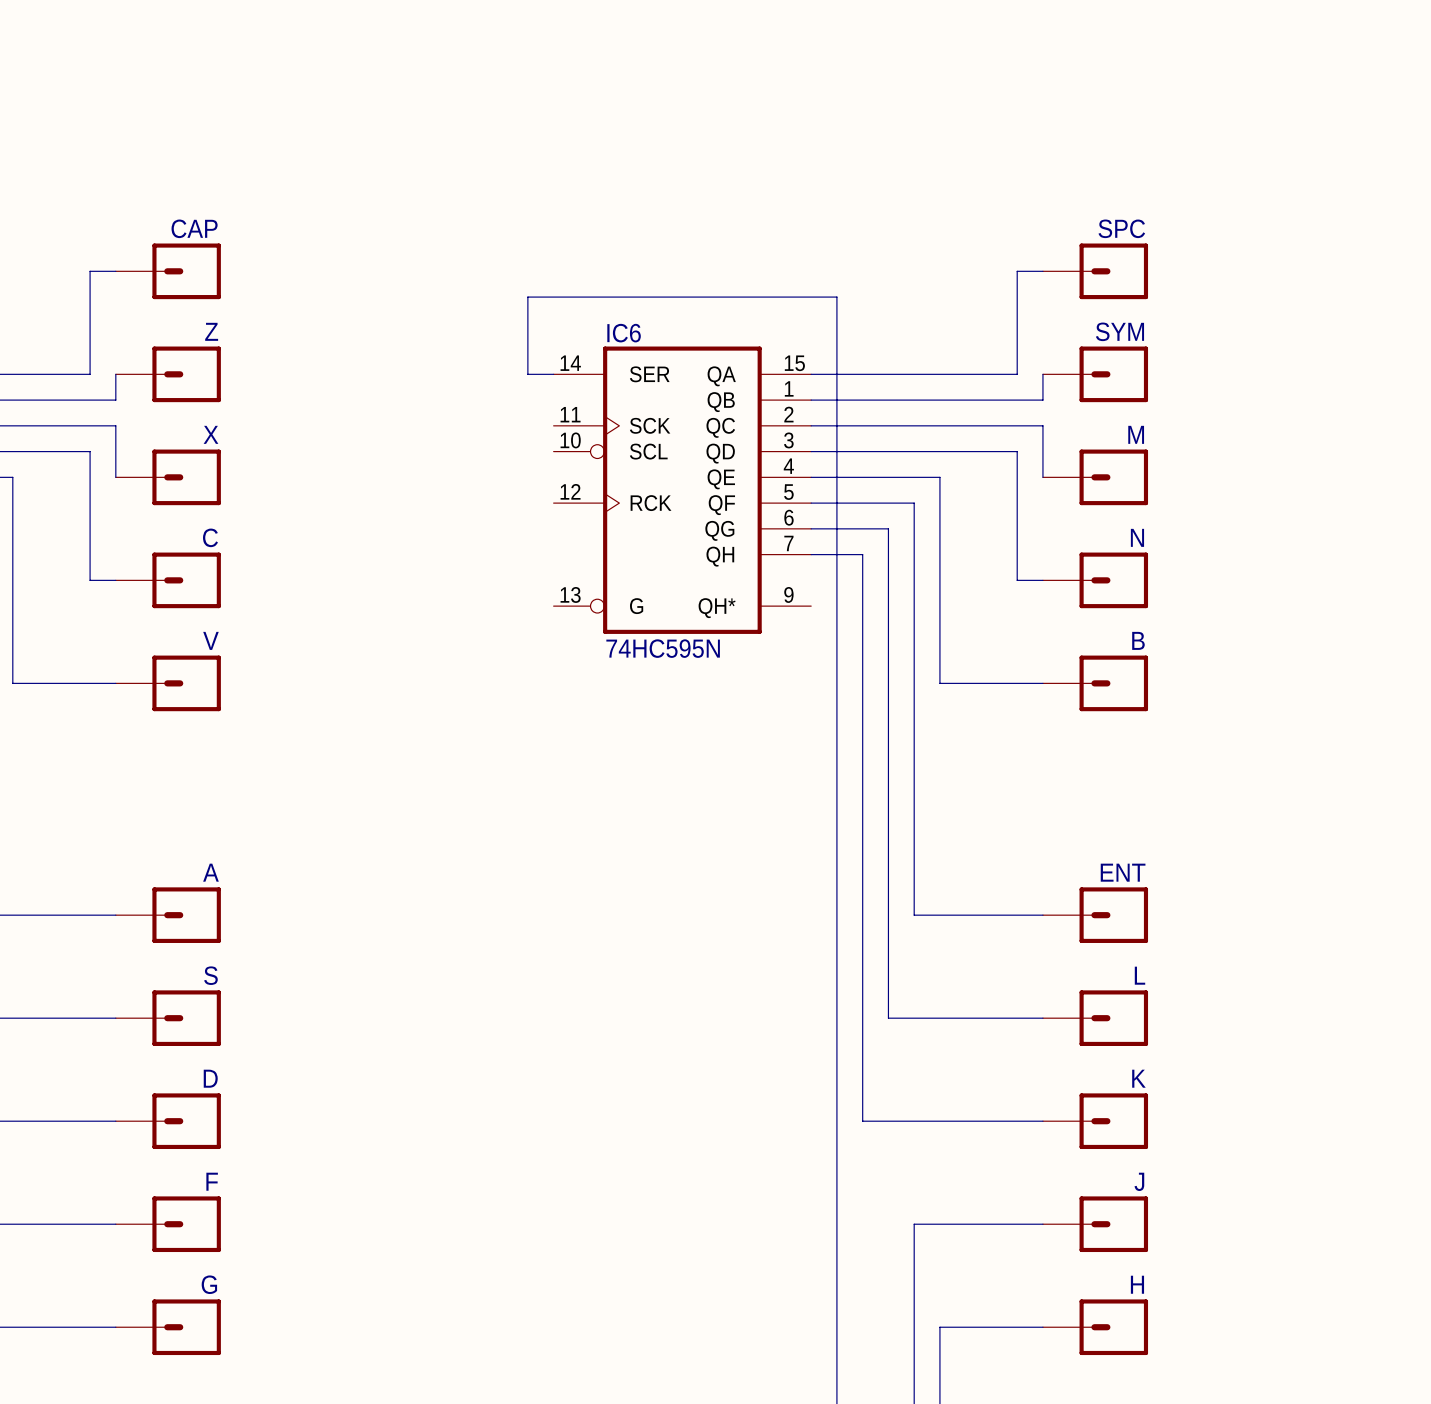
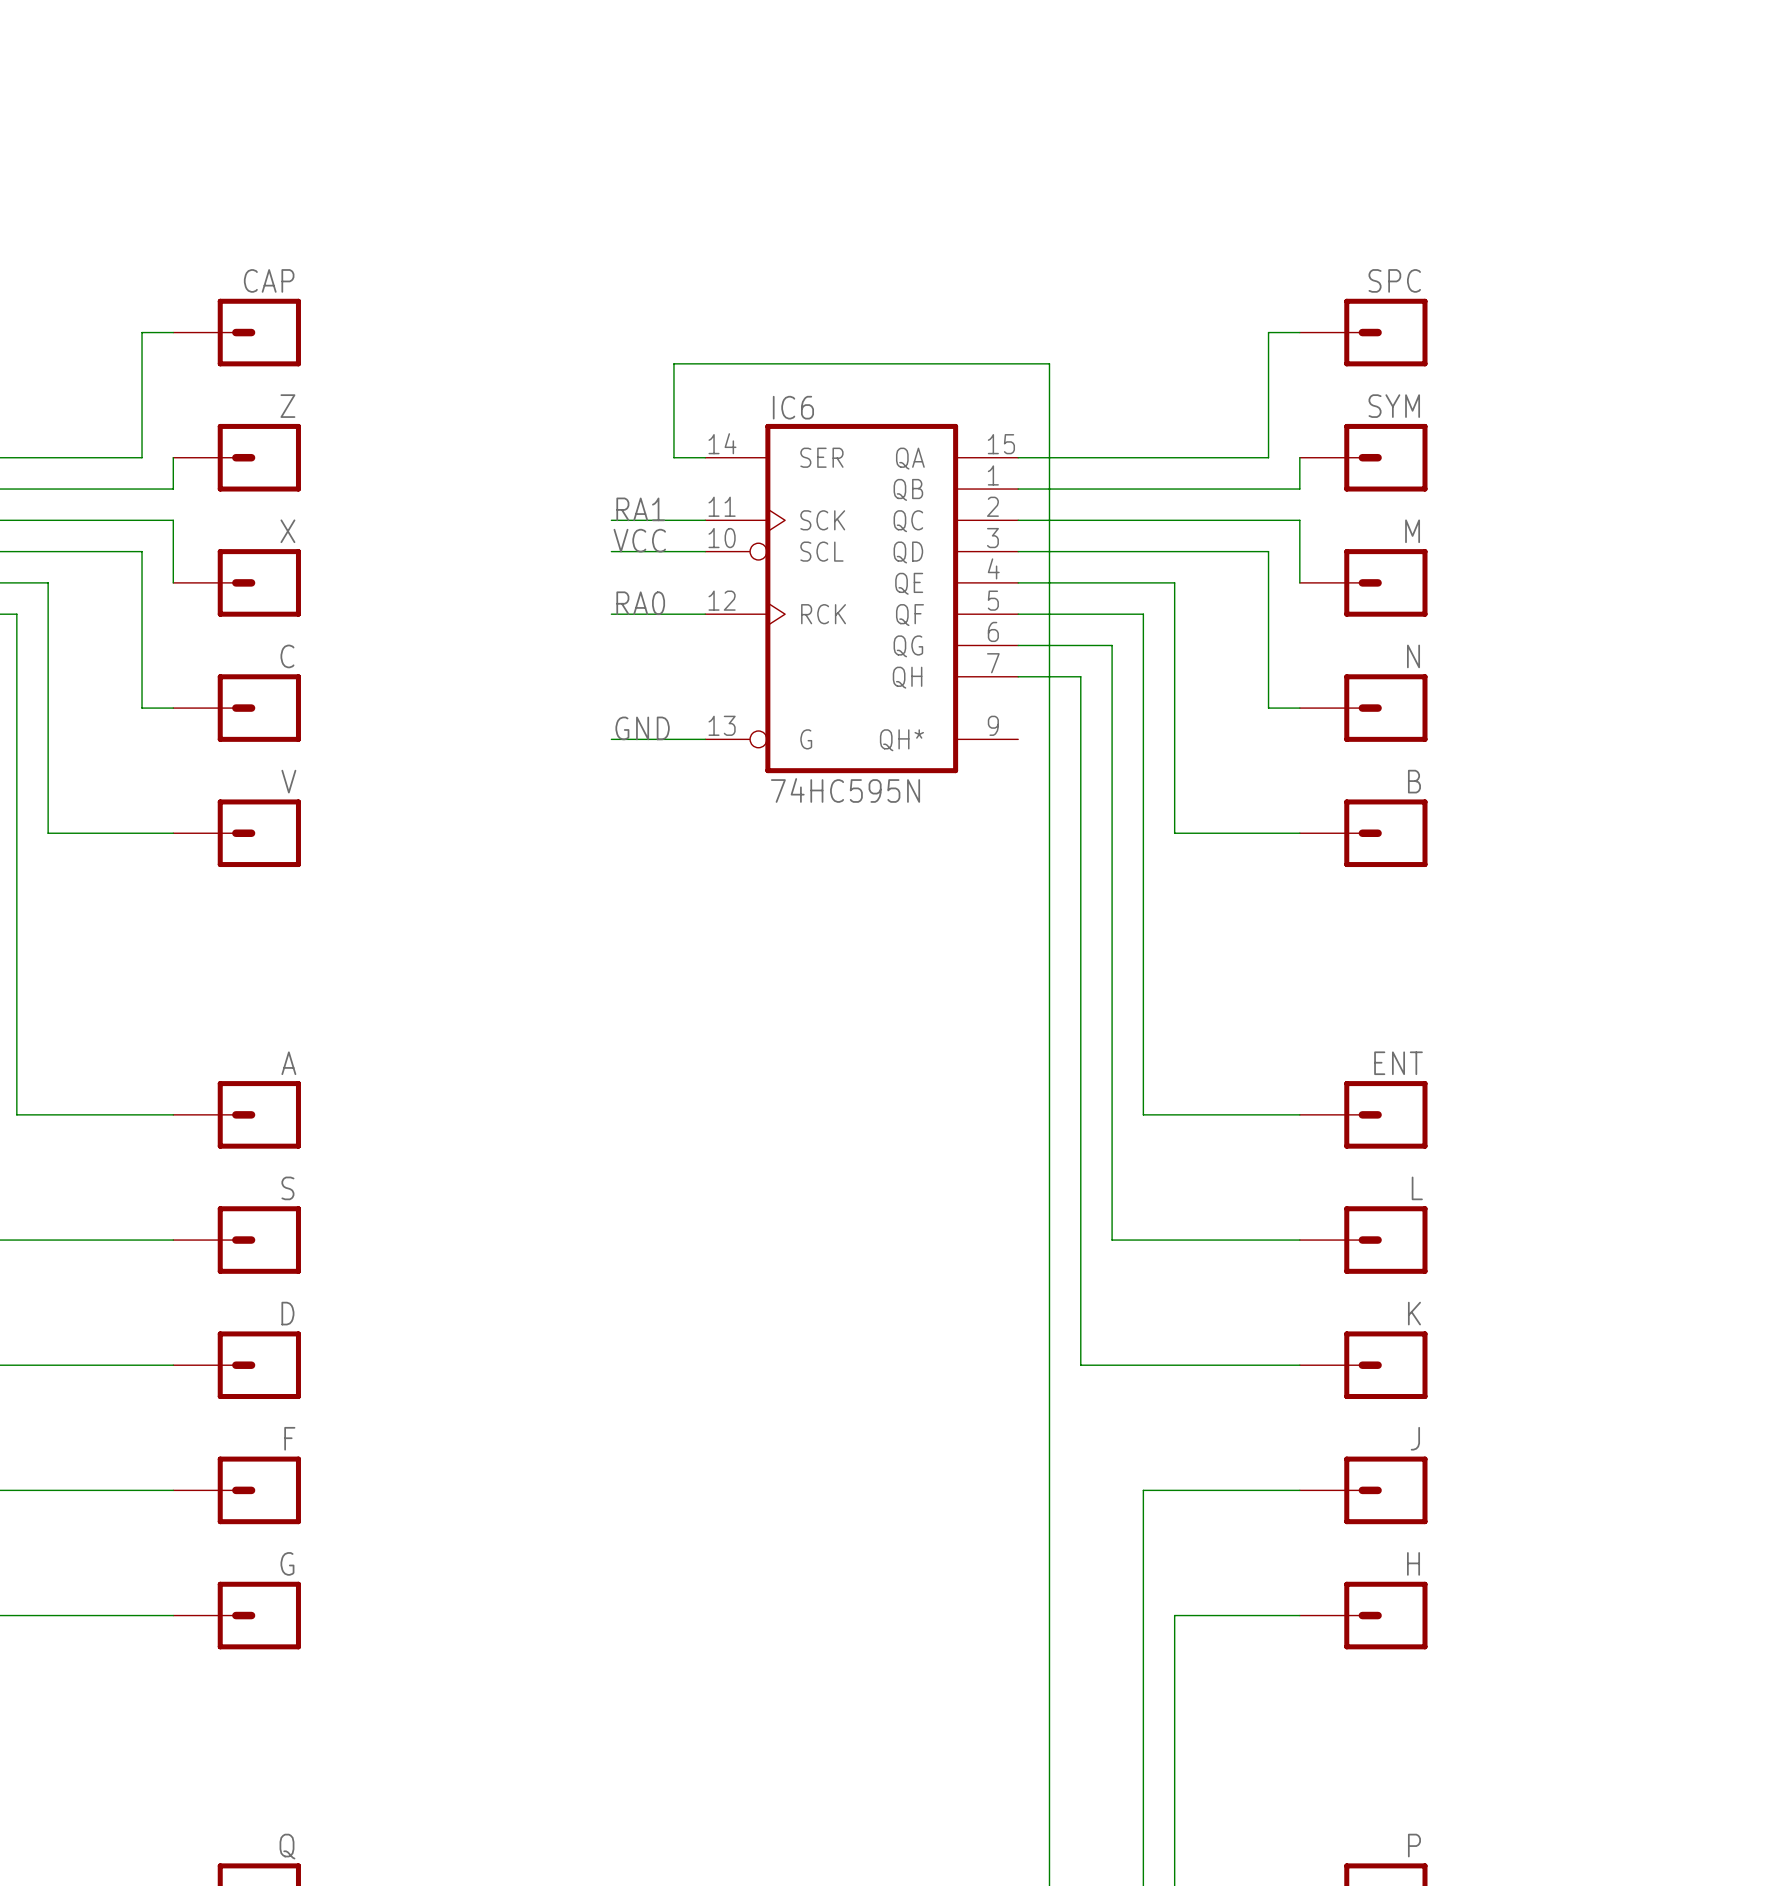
label: none -> RA1 (640, 509)
wire: none -> (611, 520) (705, 520)
label: none -> VCC (639, 540)
wire: none -> (611, 551) (705, 551)
label: none -> RA0 (640, 603)
wire: none -> (611, 614) (705, 614)
label: none -> GND (642, 728)
wire: none -> (611, 739) (705, 739)

